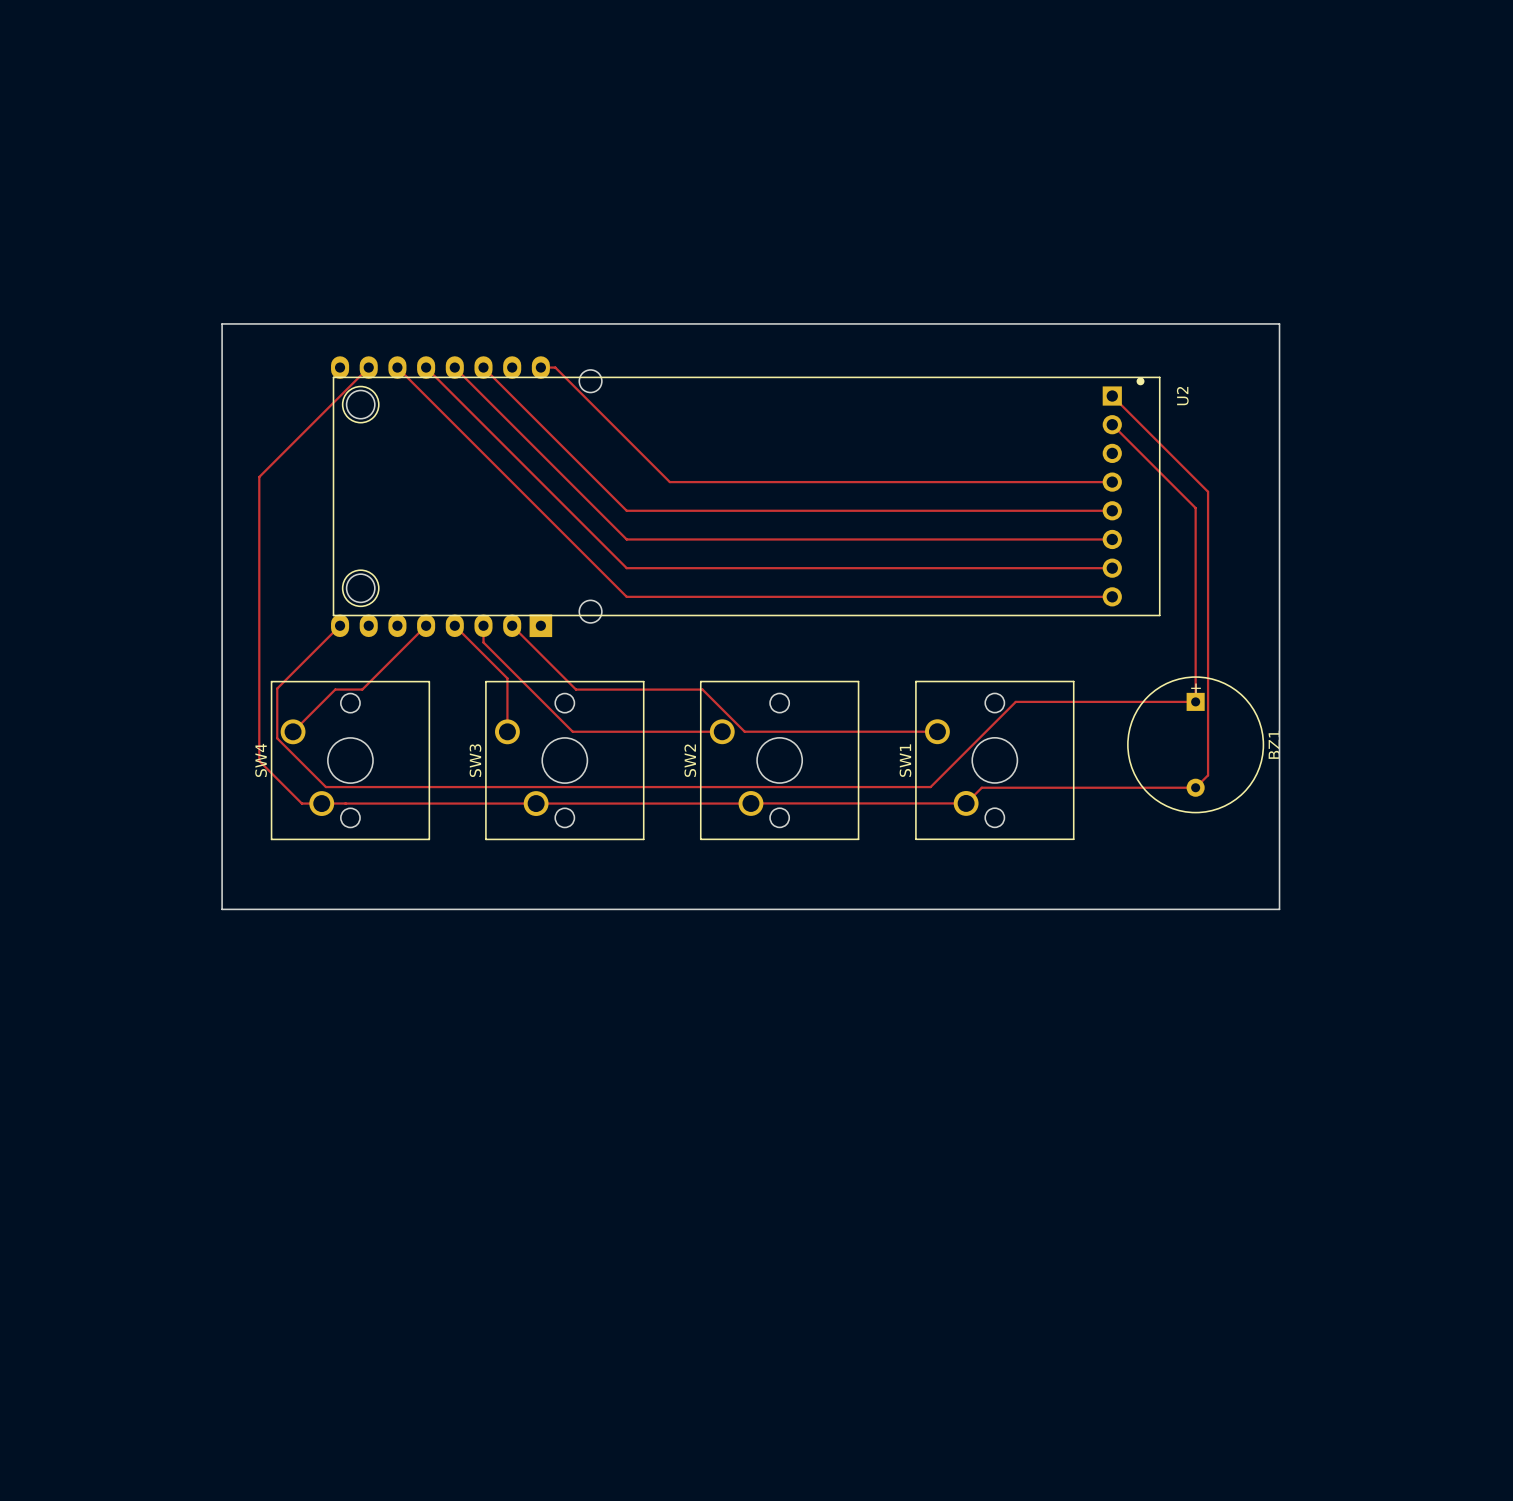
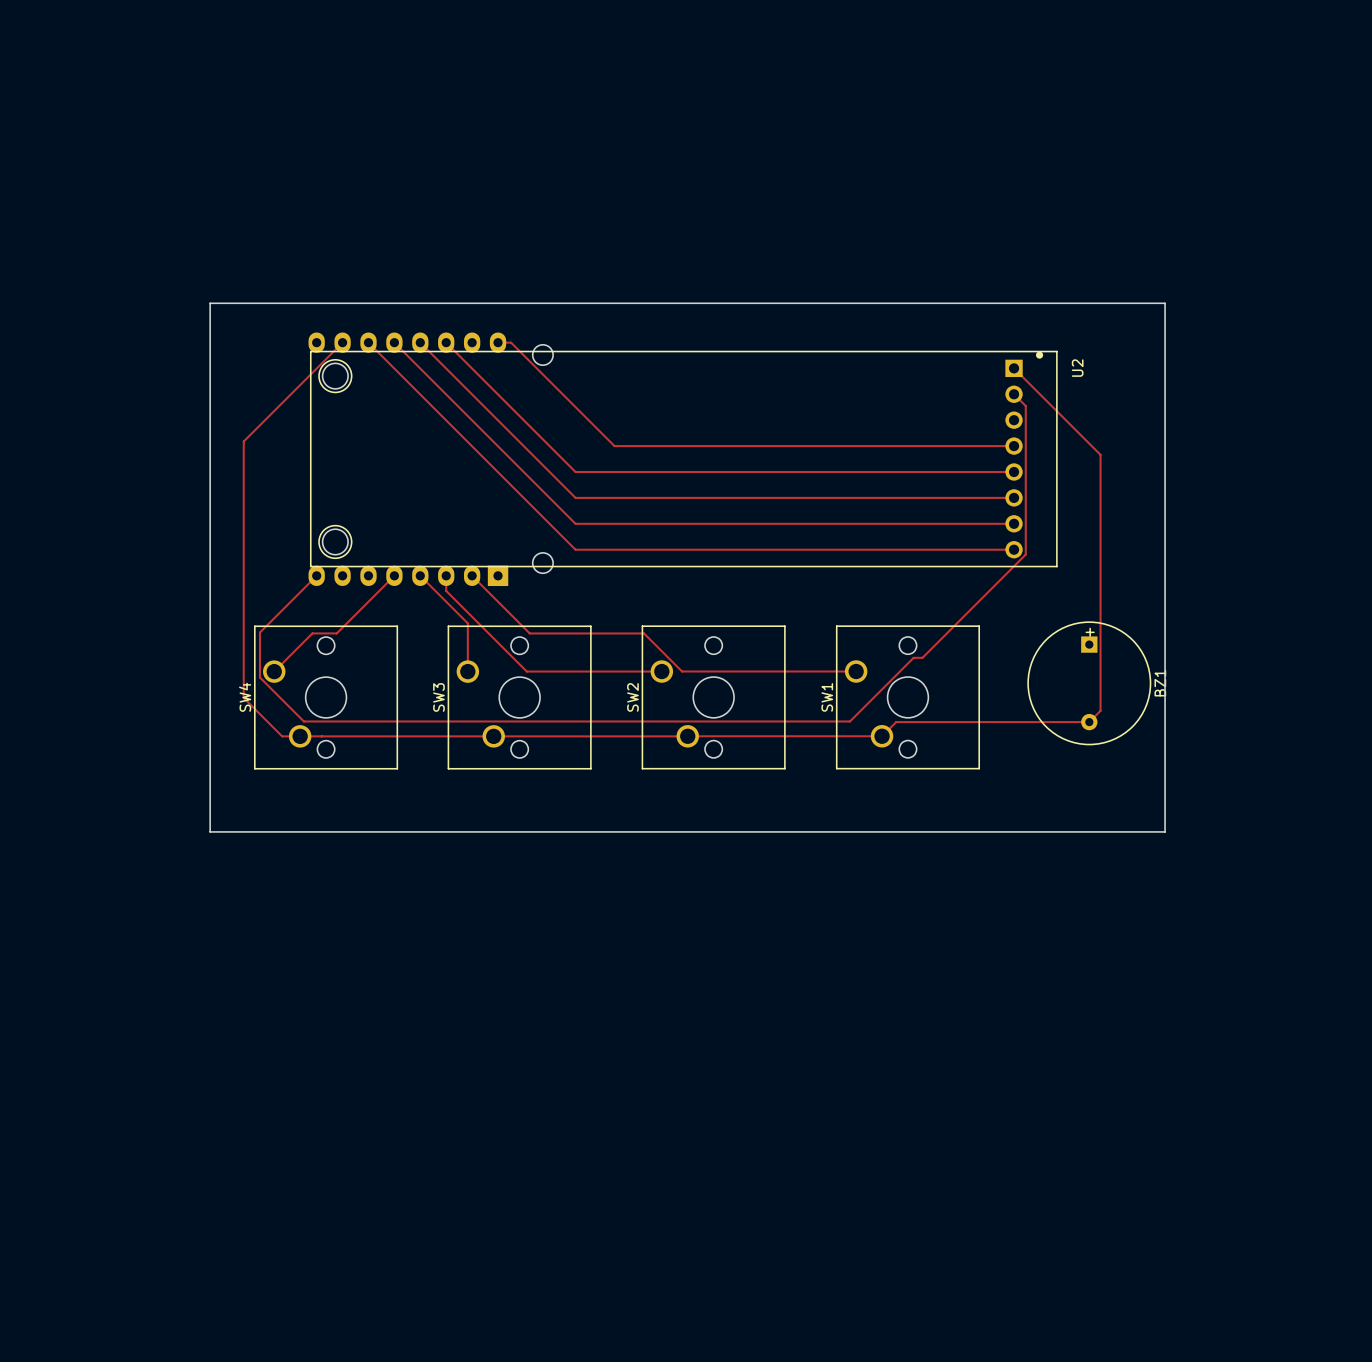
track: (1125, 437) (1195, 508) (1195, 701) (1015, 701) (1001, 716) -> (1025, 406) (1025, 554) (922, 657) (913, 657)

